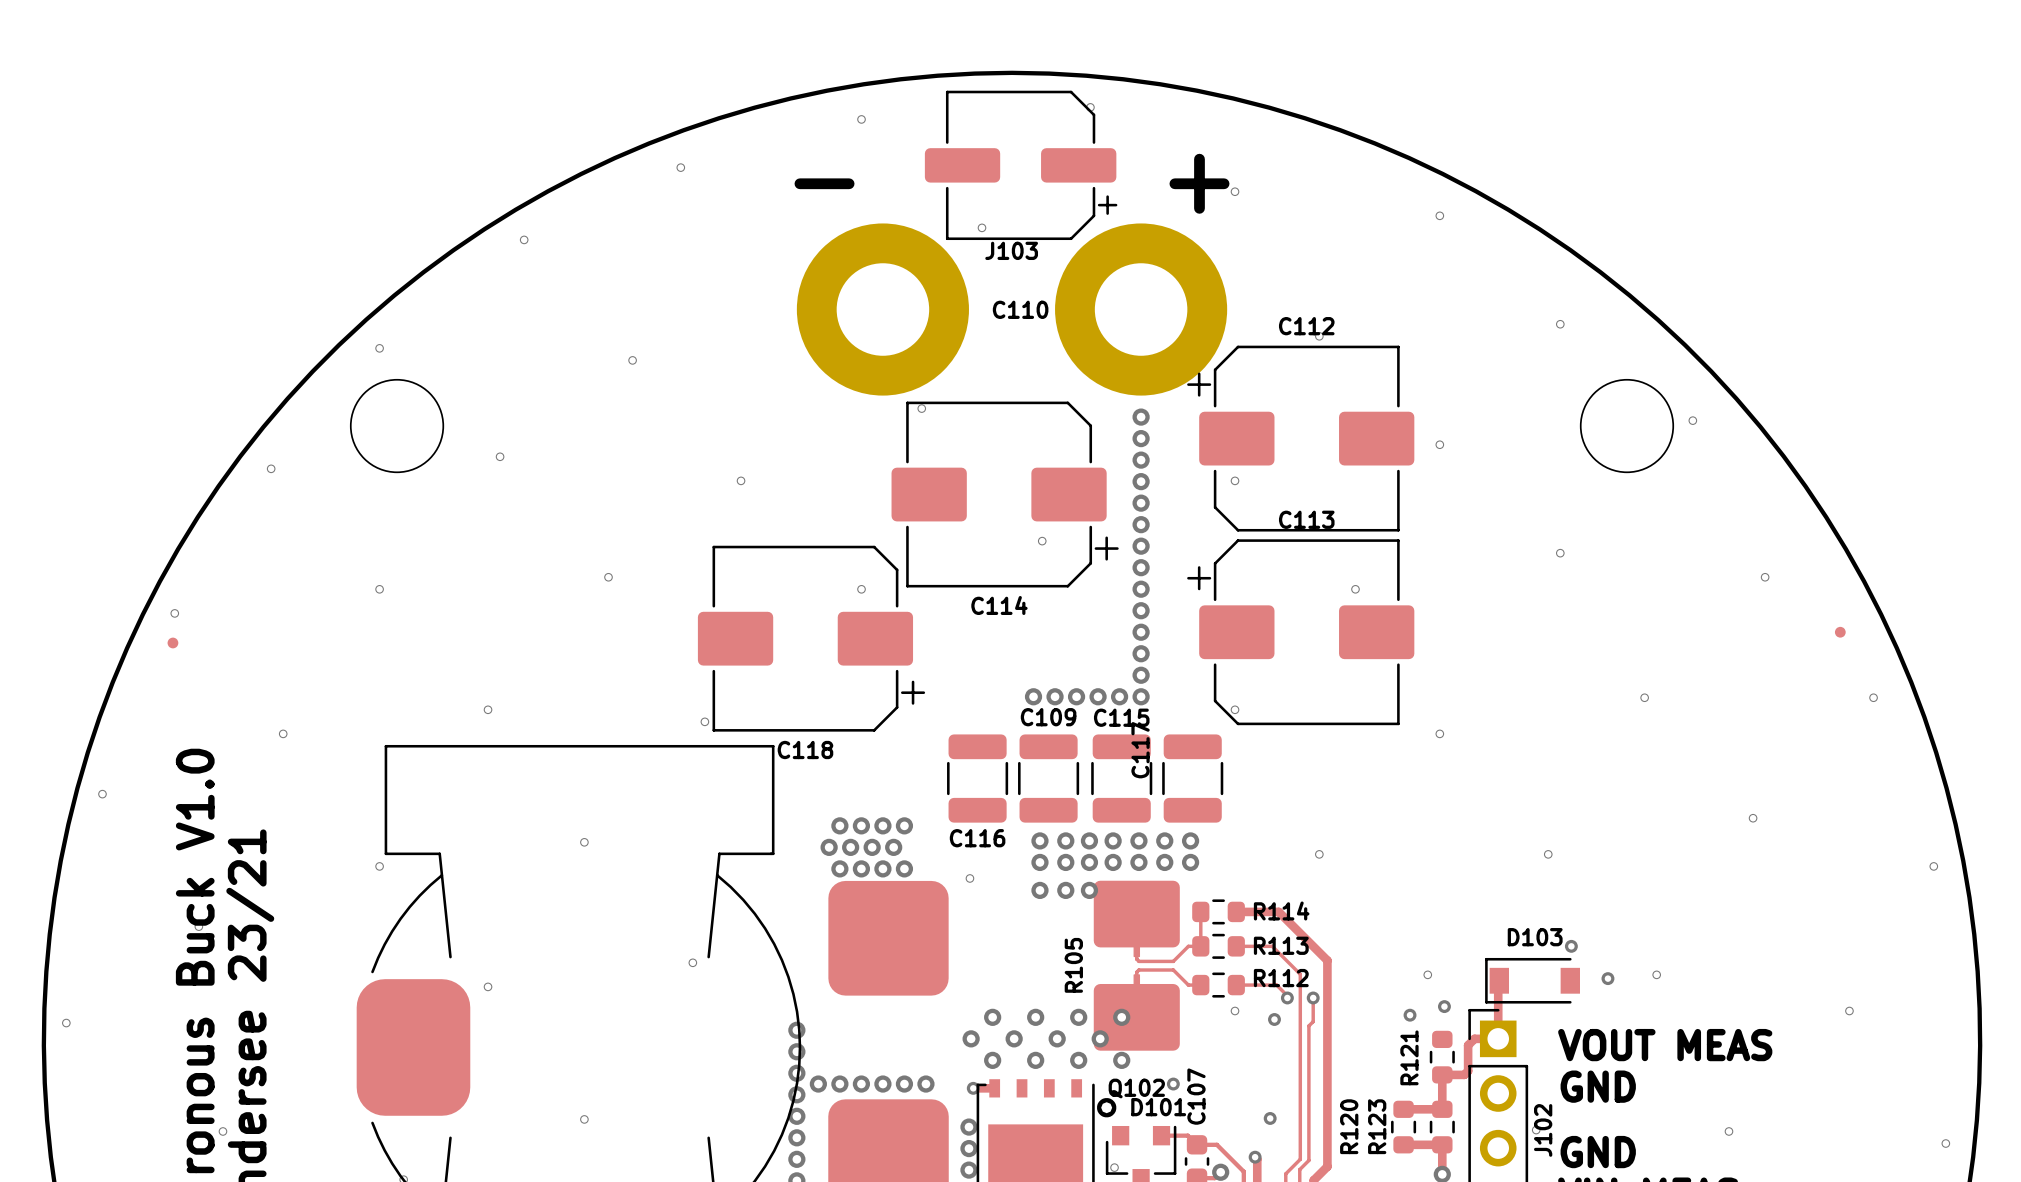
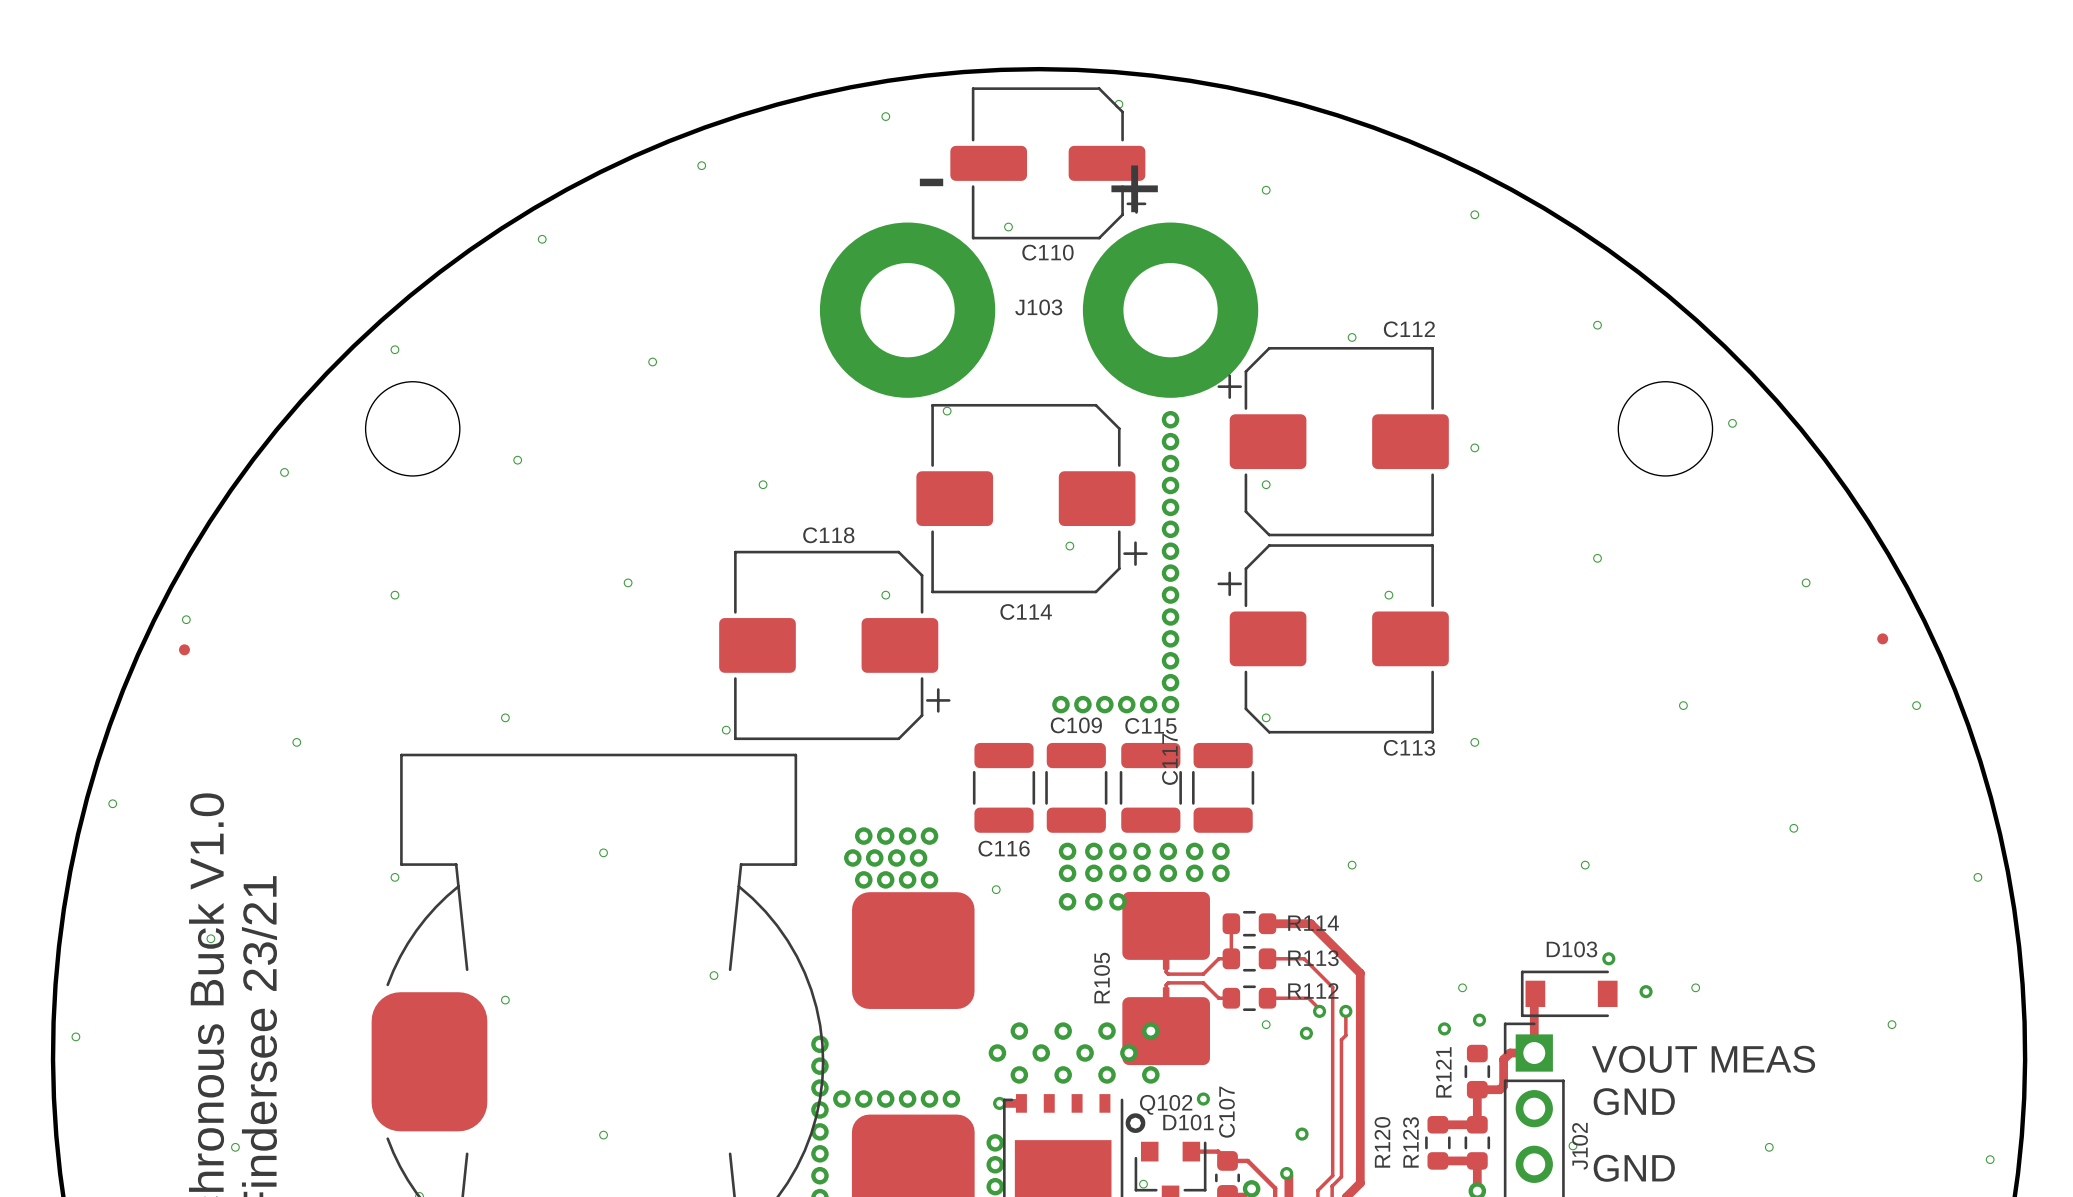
J103 name position: J103 (1011, 250) -> J103 (1038, 307)
C110 name position: C110 (1020, 309) -> C110 (1047, 252)
C112 name position: C112 (1306, 326) -> C112 (1409, 329)
C113 name position: C113 (1306, 519) -> C113 (1409, 747)
C118 name position: C118 (805, 750) -> C118 (828, 535)

